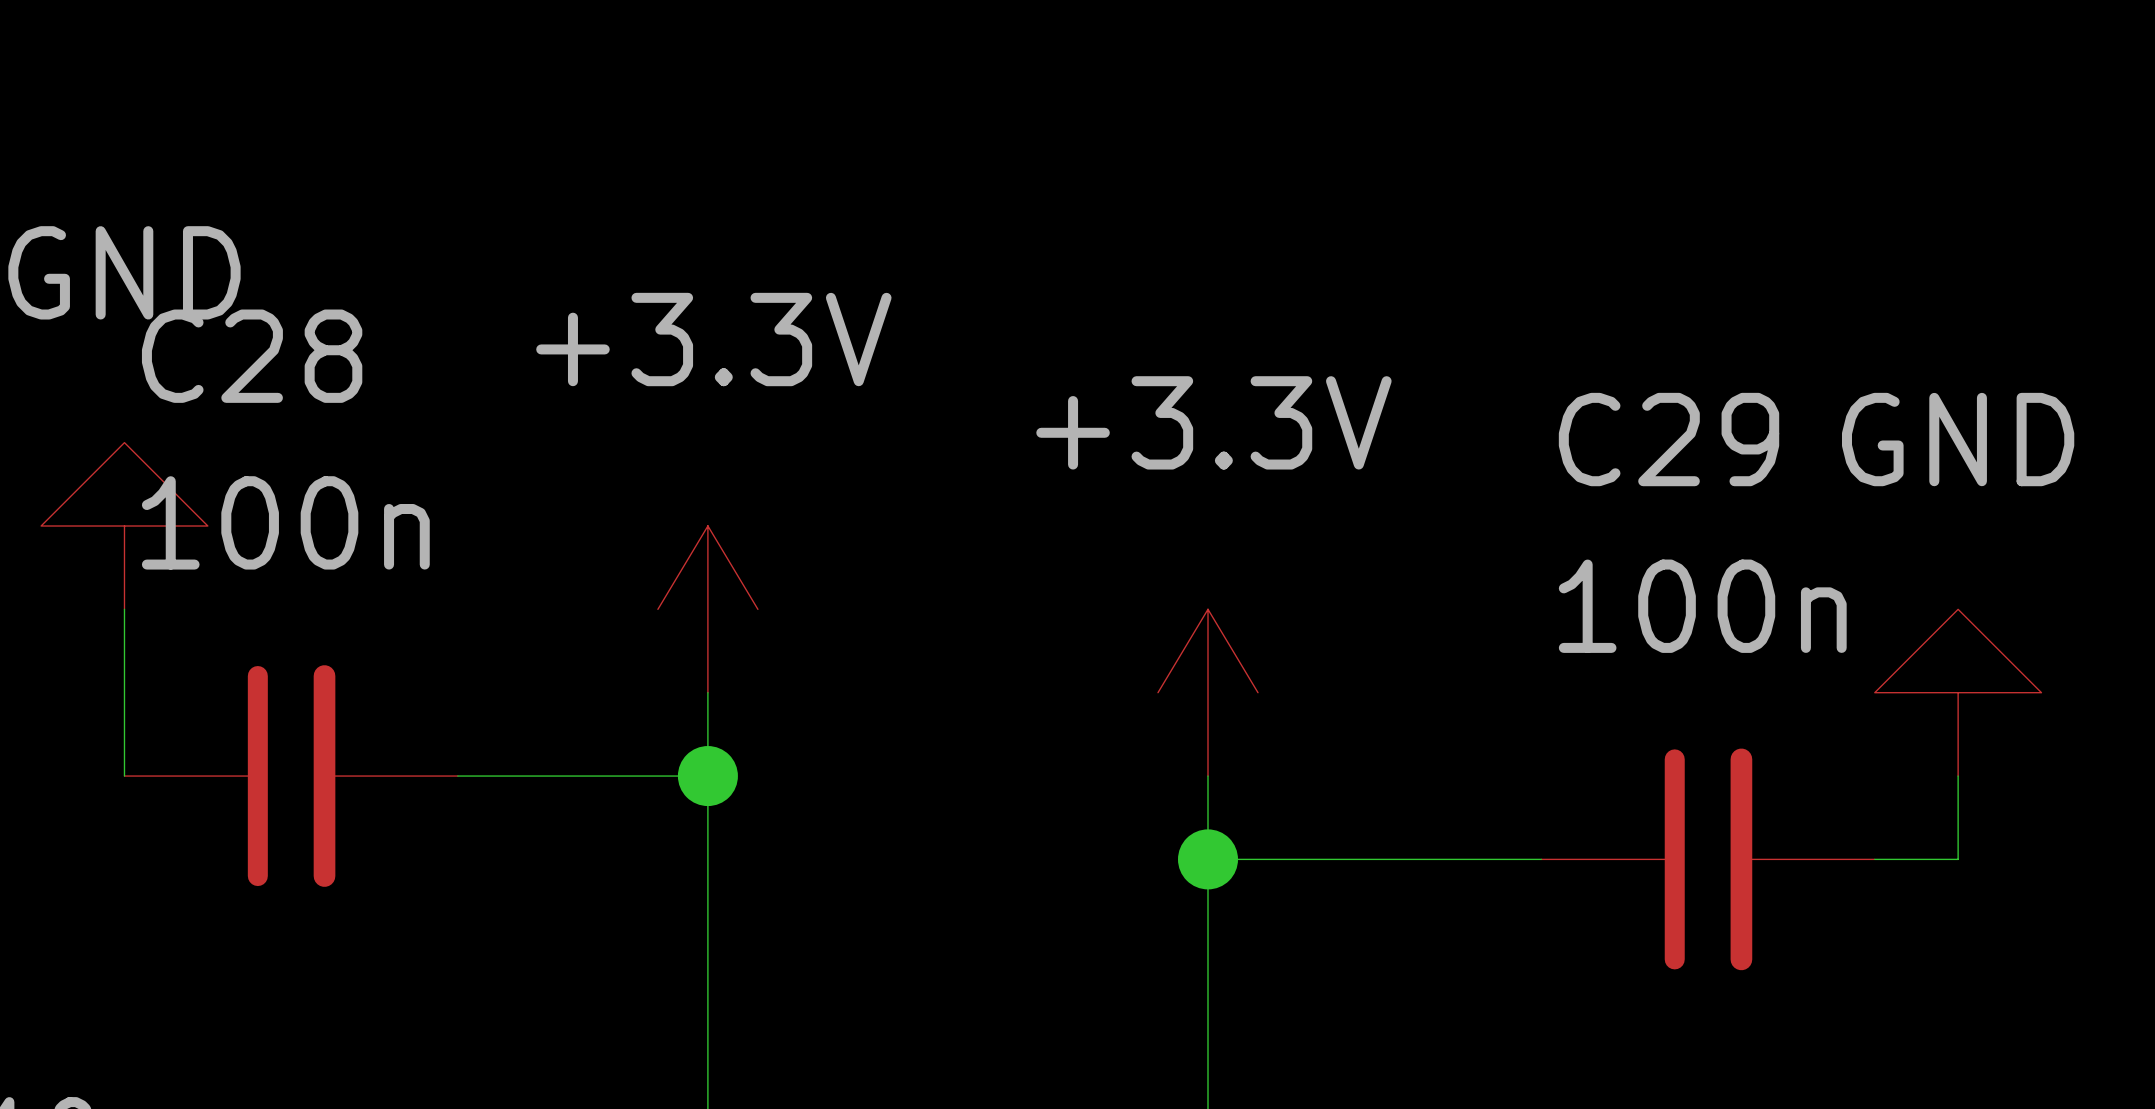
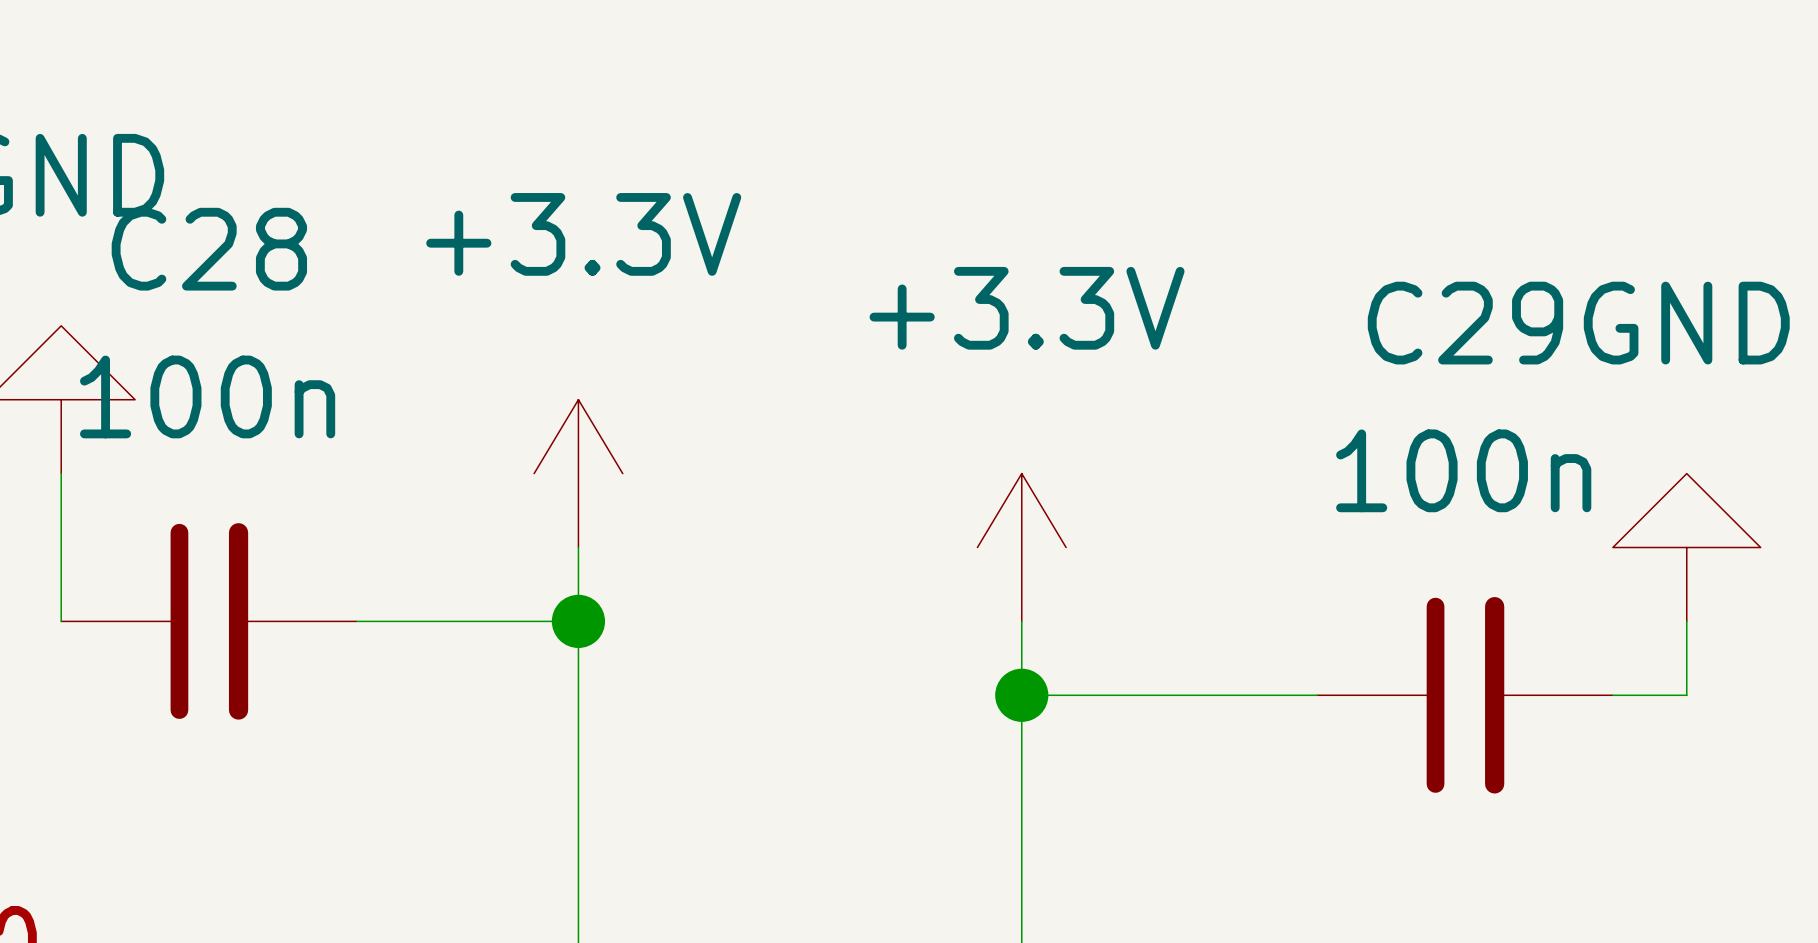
C28 name position: C28 (252, 356) -> C28 (209, 249)
C29 name position: C29 (1669, 439) -> C29 (1465, 323)
C28 value position: 100n (285, 522) -> 100n (207, 396)
C29 value position: 100n (1702, 606) -> 100n (1463, 470)

